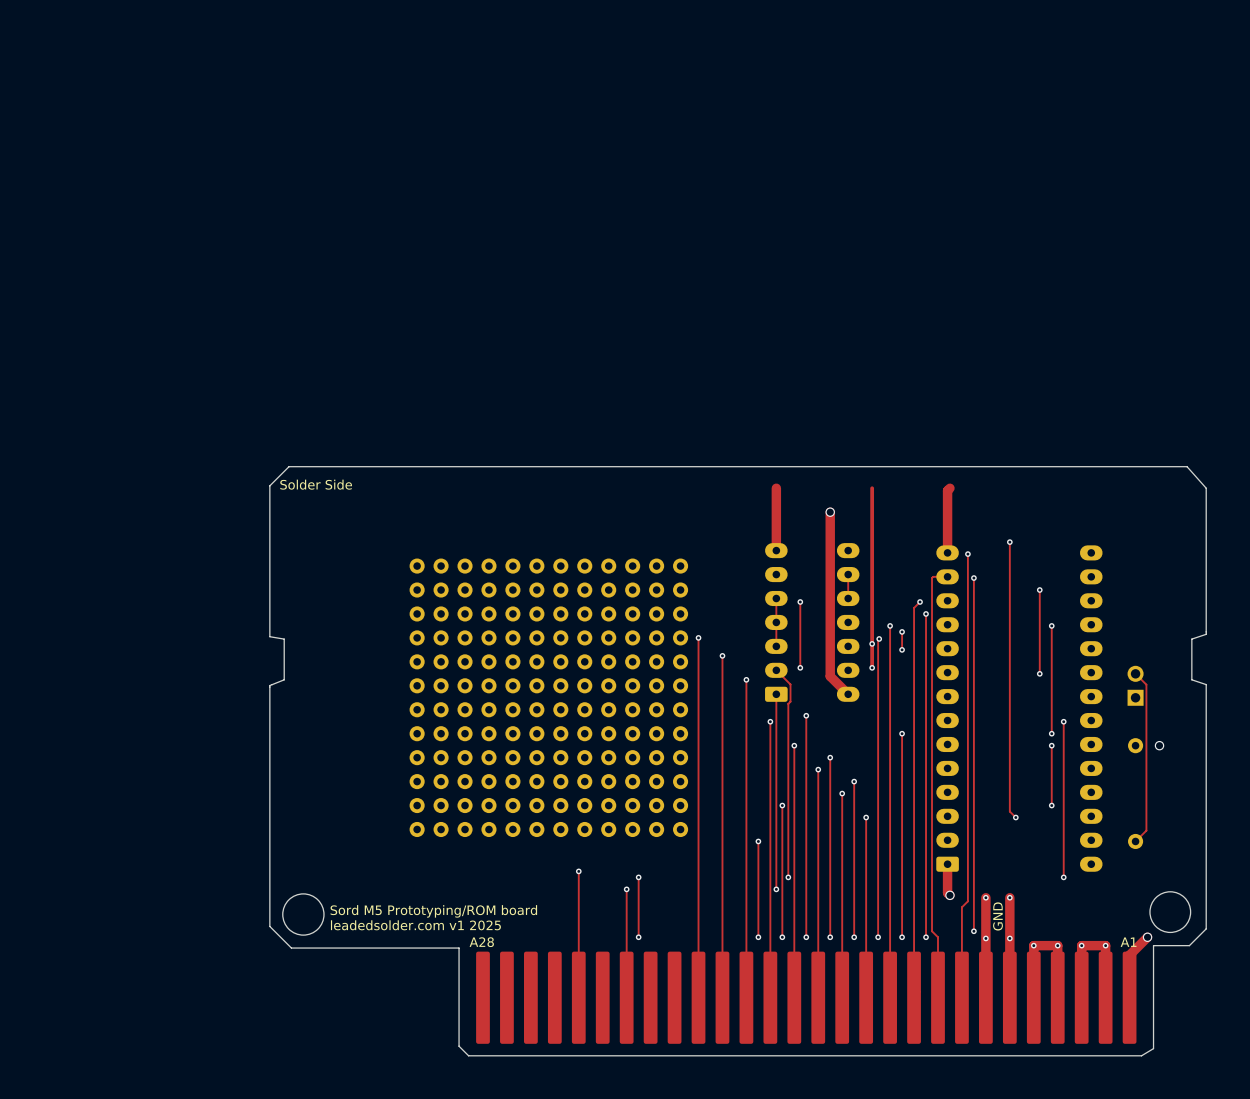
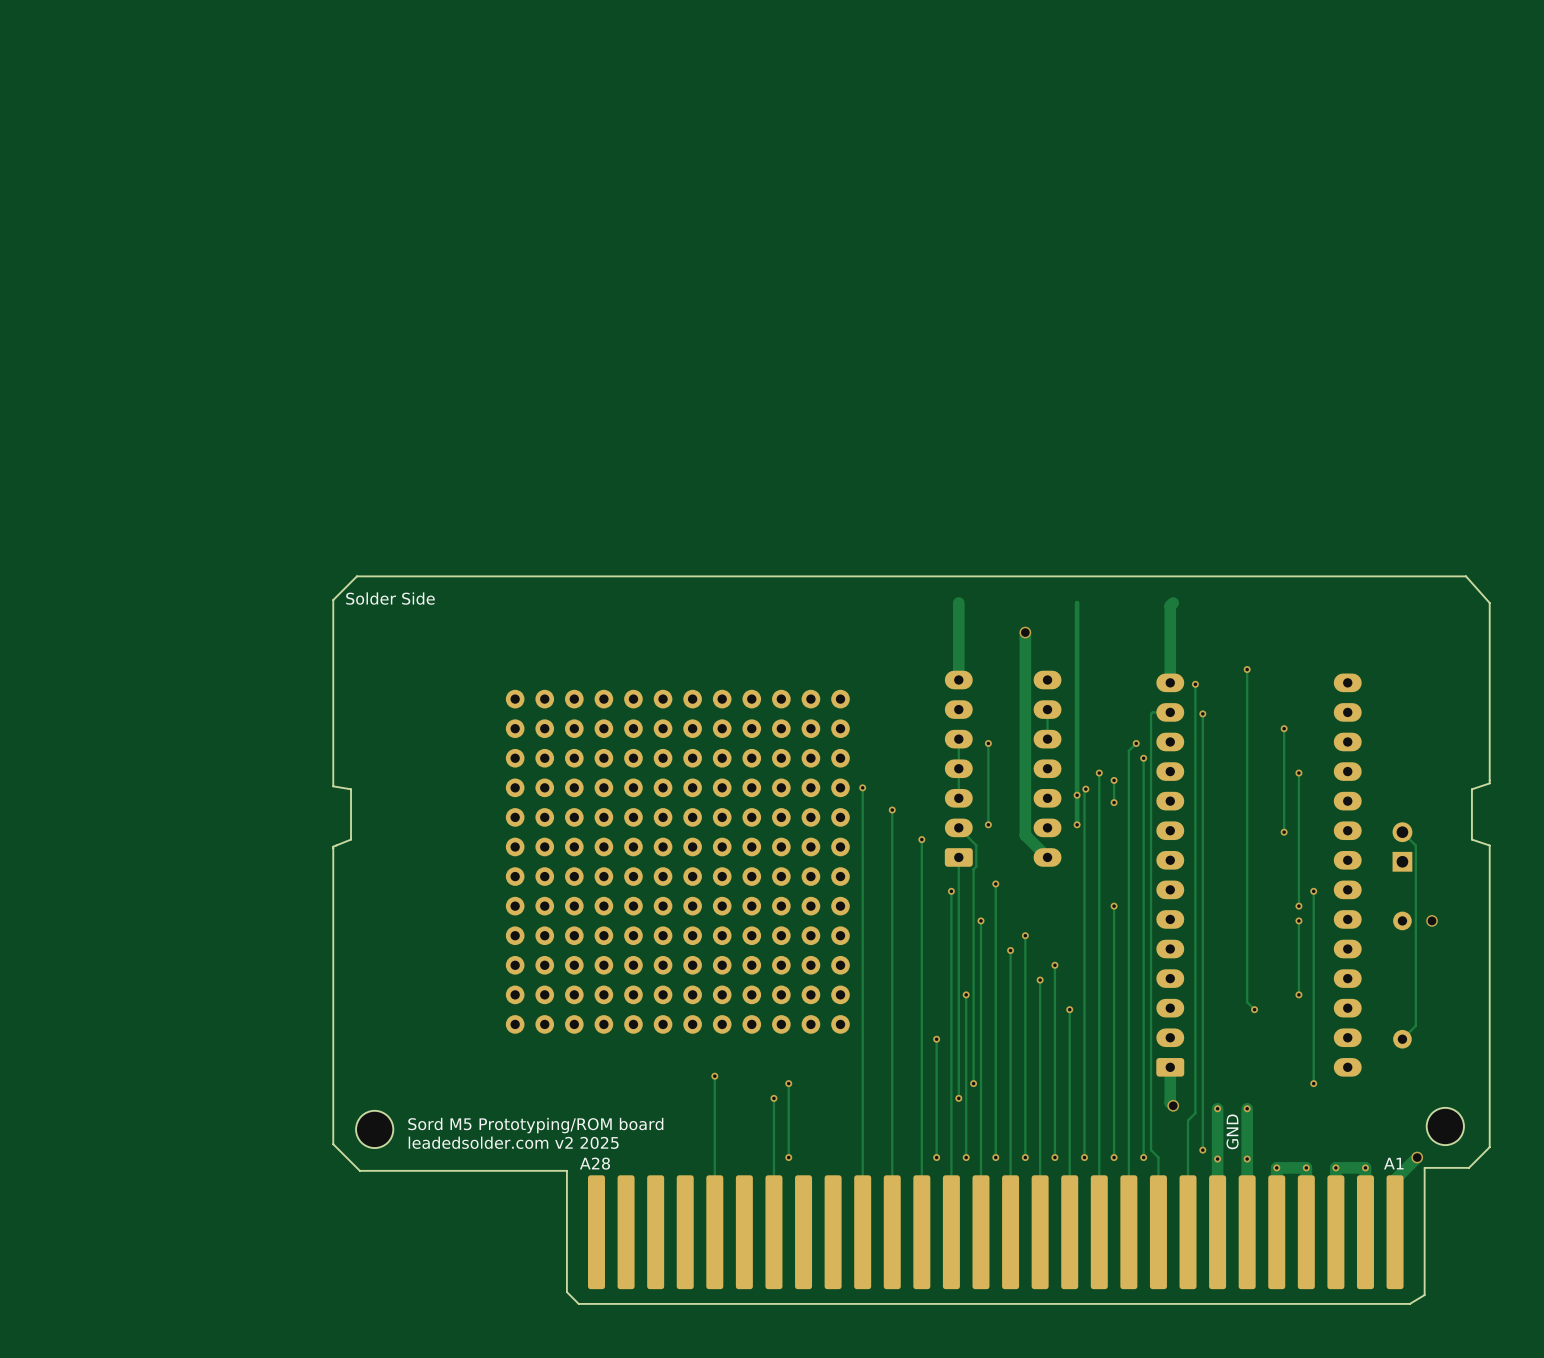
round board edge: [1149, 891, 1191, 933] -> none
round board edge: [282, 893, 325, 936] -> none
part: none -> (1445, 1126)
part: none -> (374, 1129)
text: leadedsolder.com v1 2025 (415, 925) -> leadedsolder.com v2 2025 (513, 1142)

